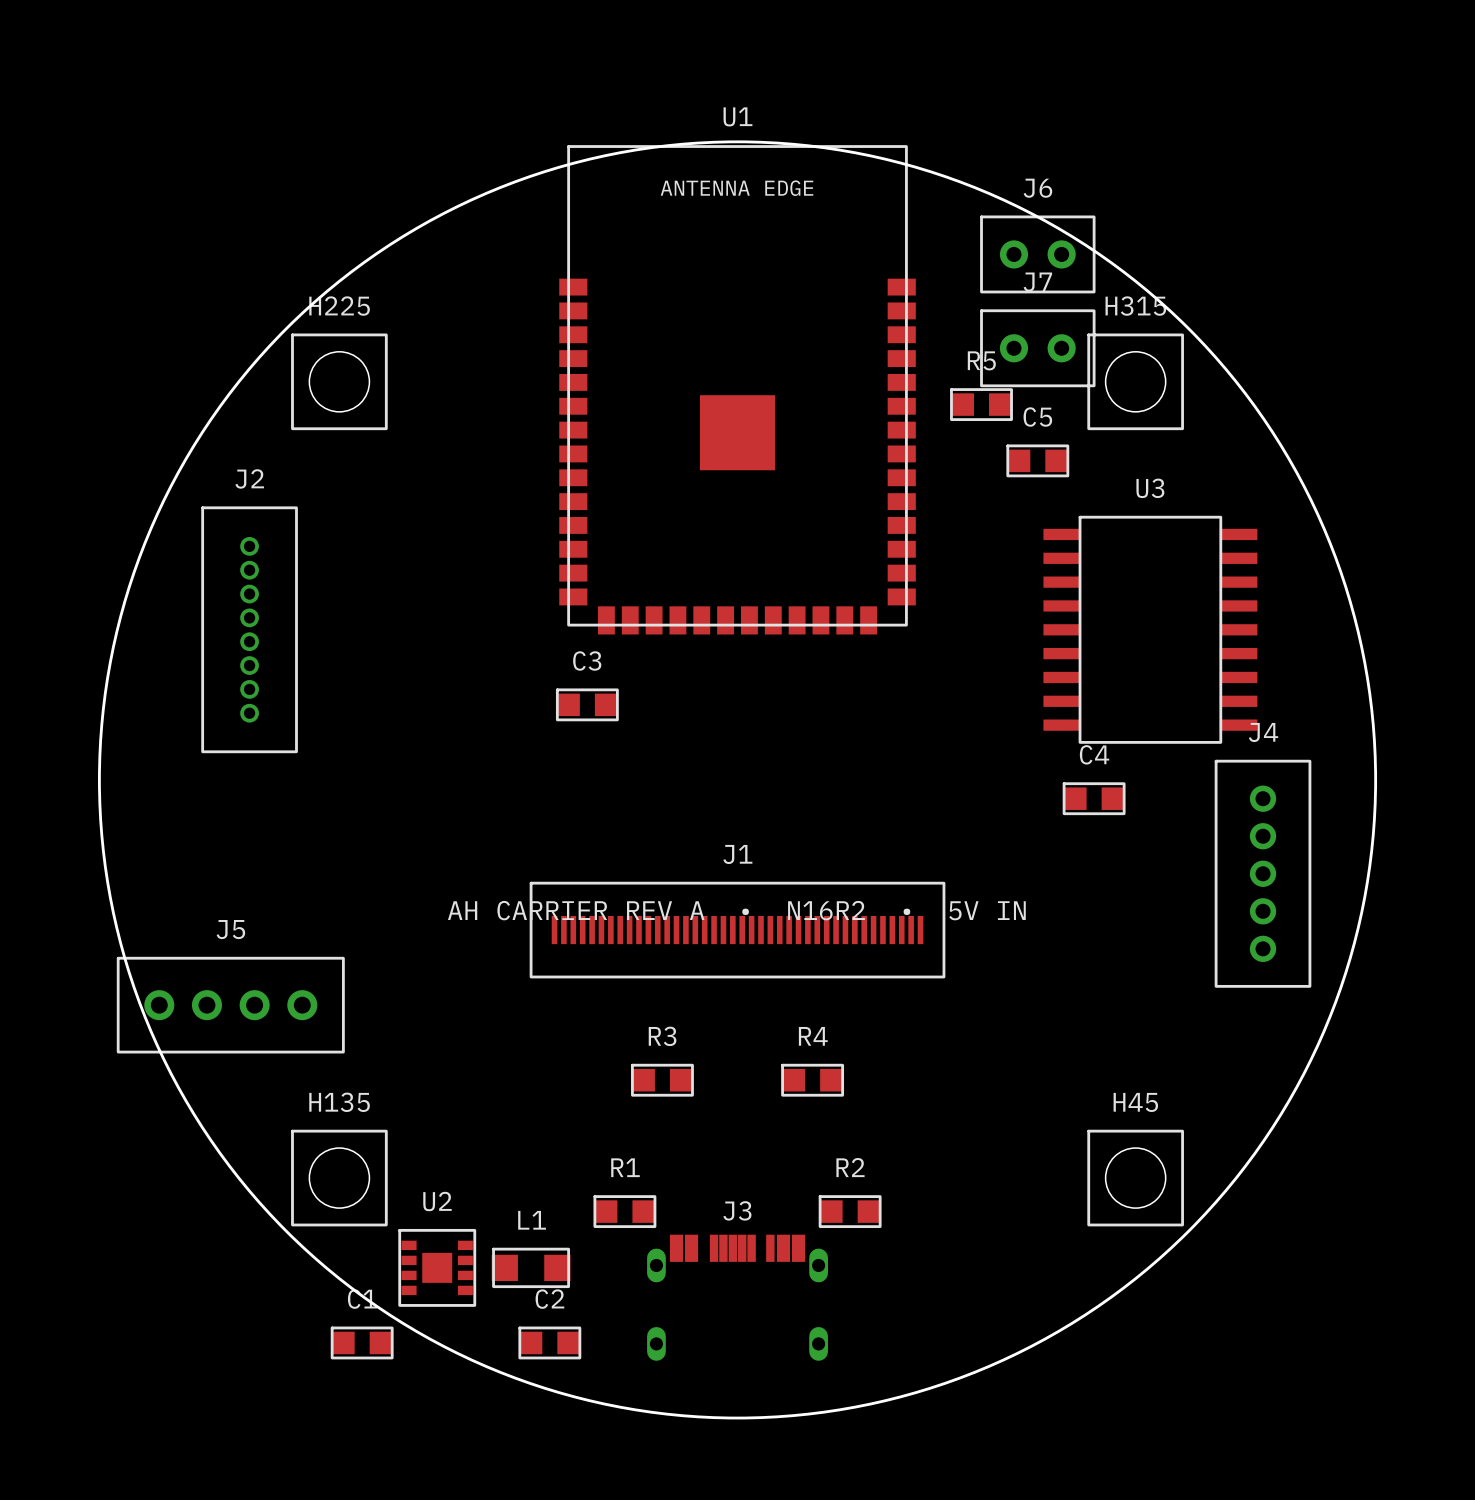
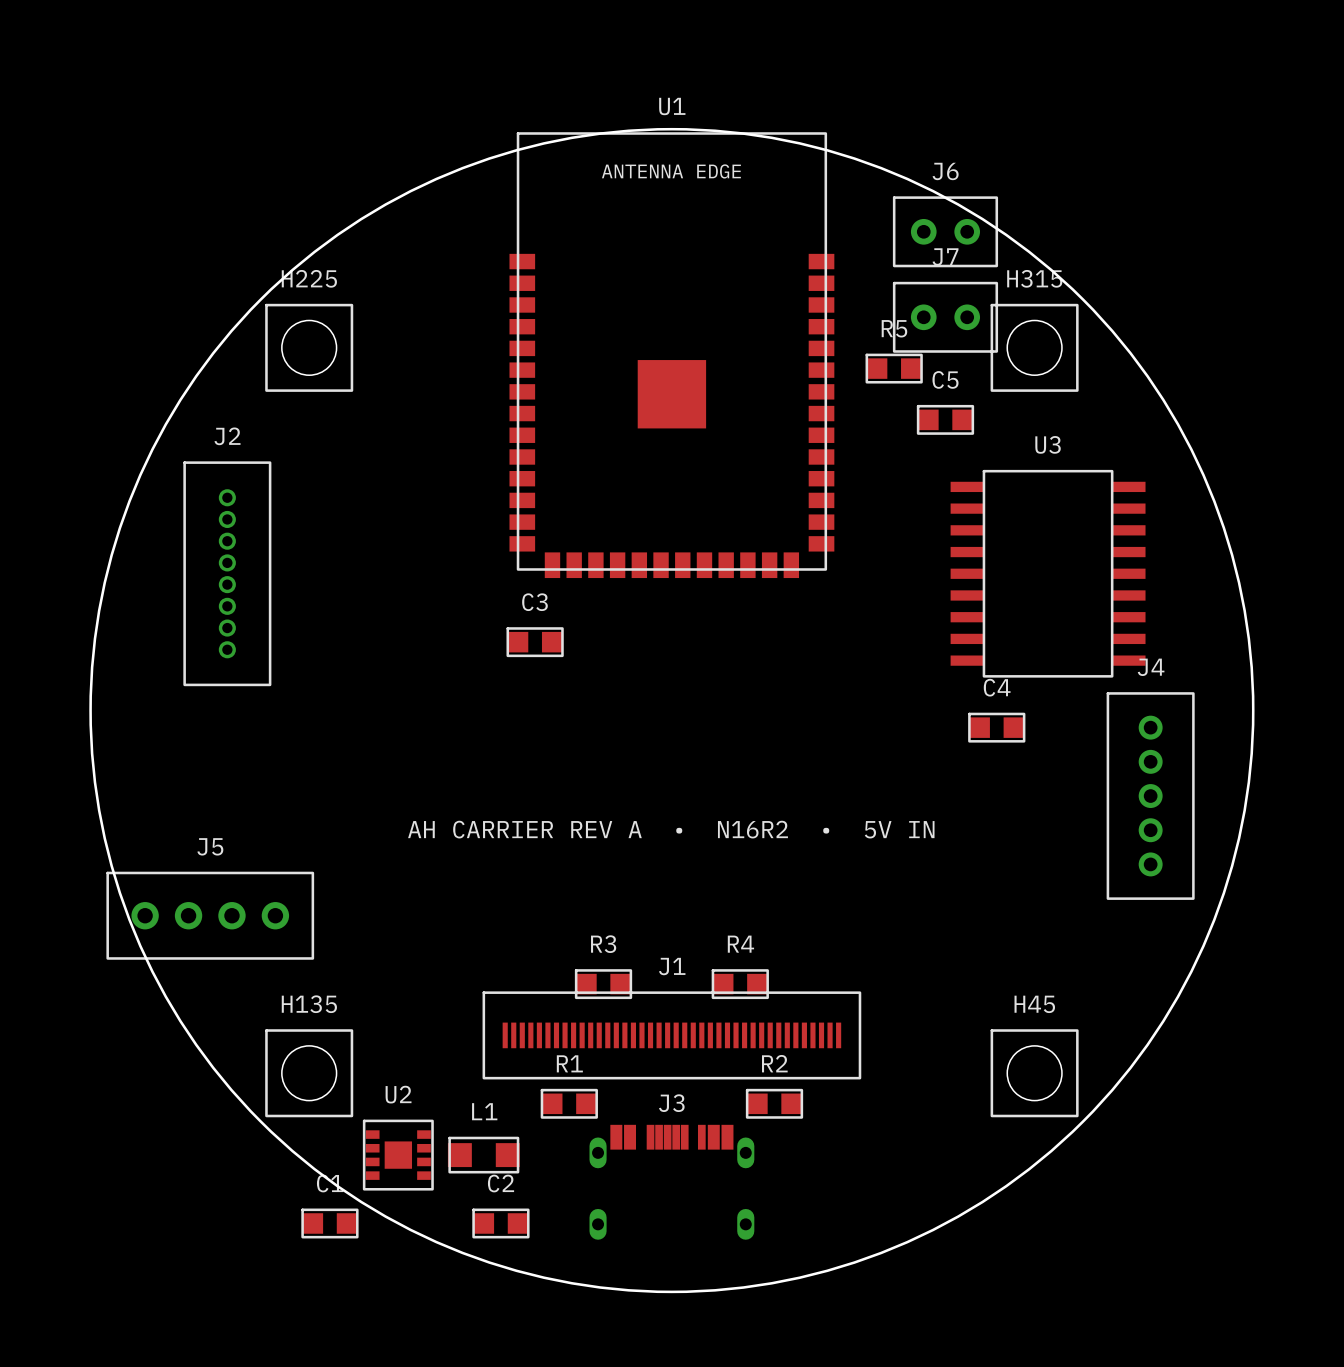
J1 position: (737, 930) -> (671, 1035)

